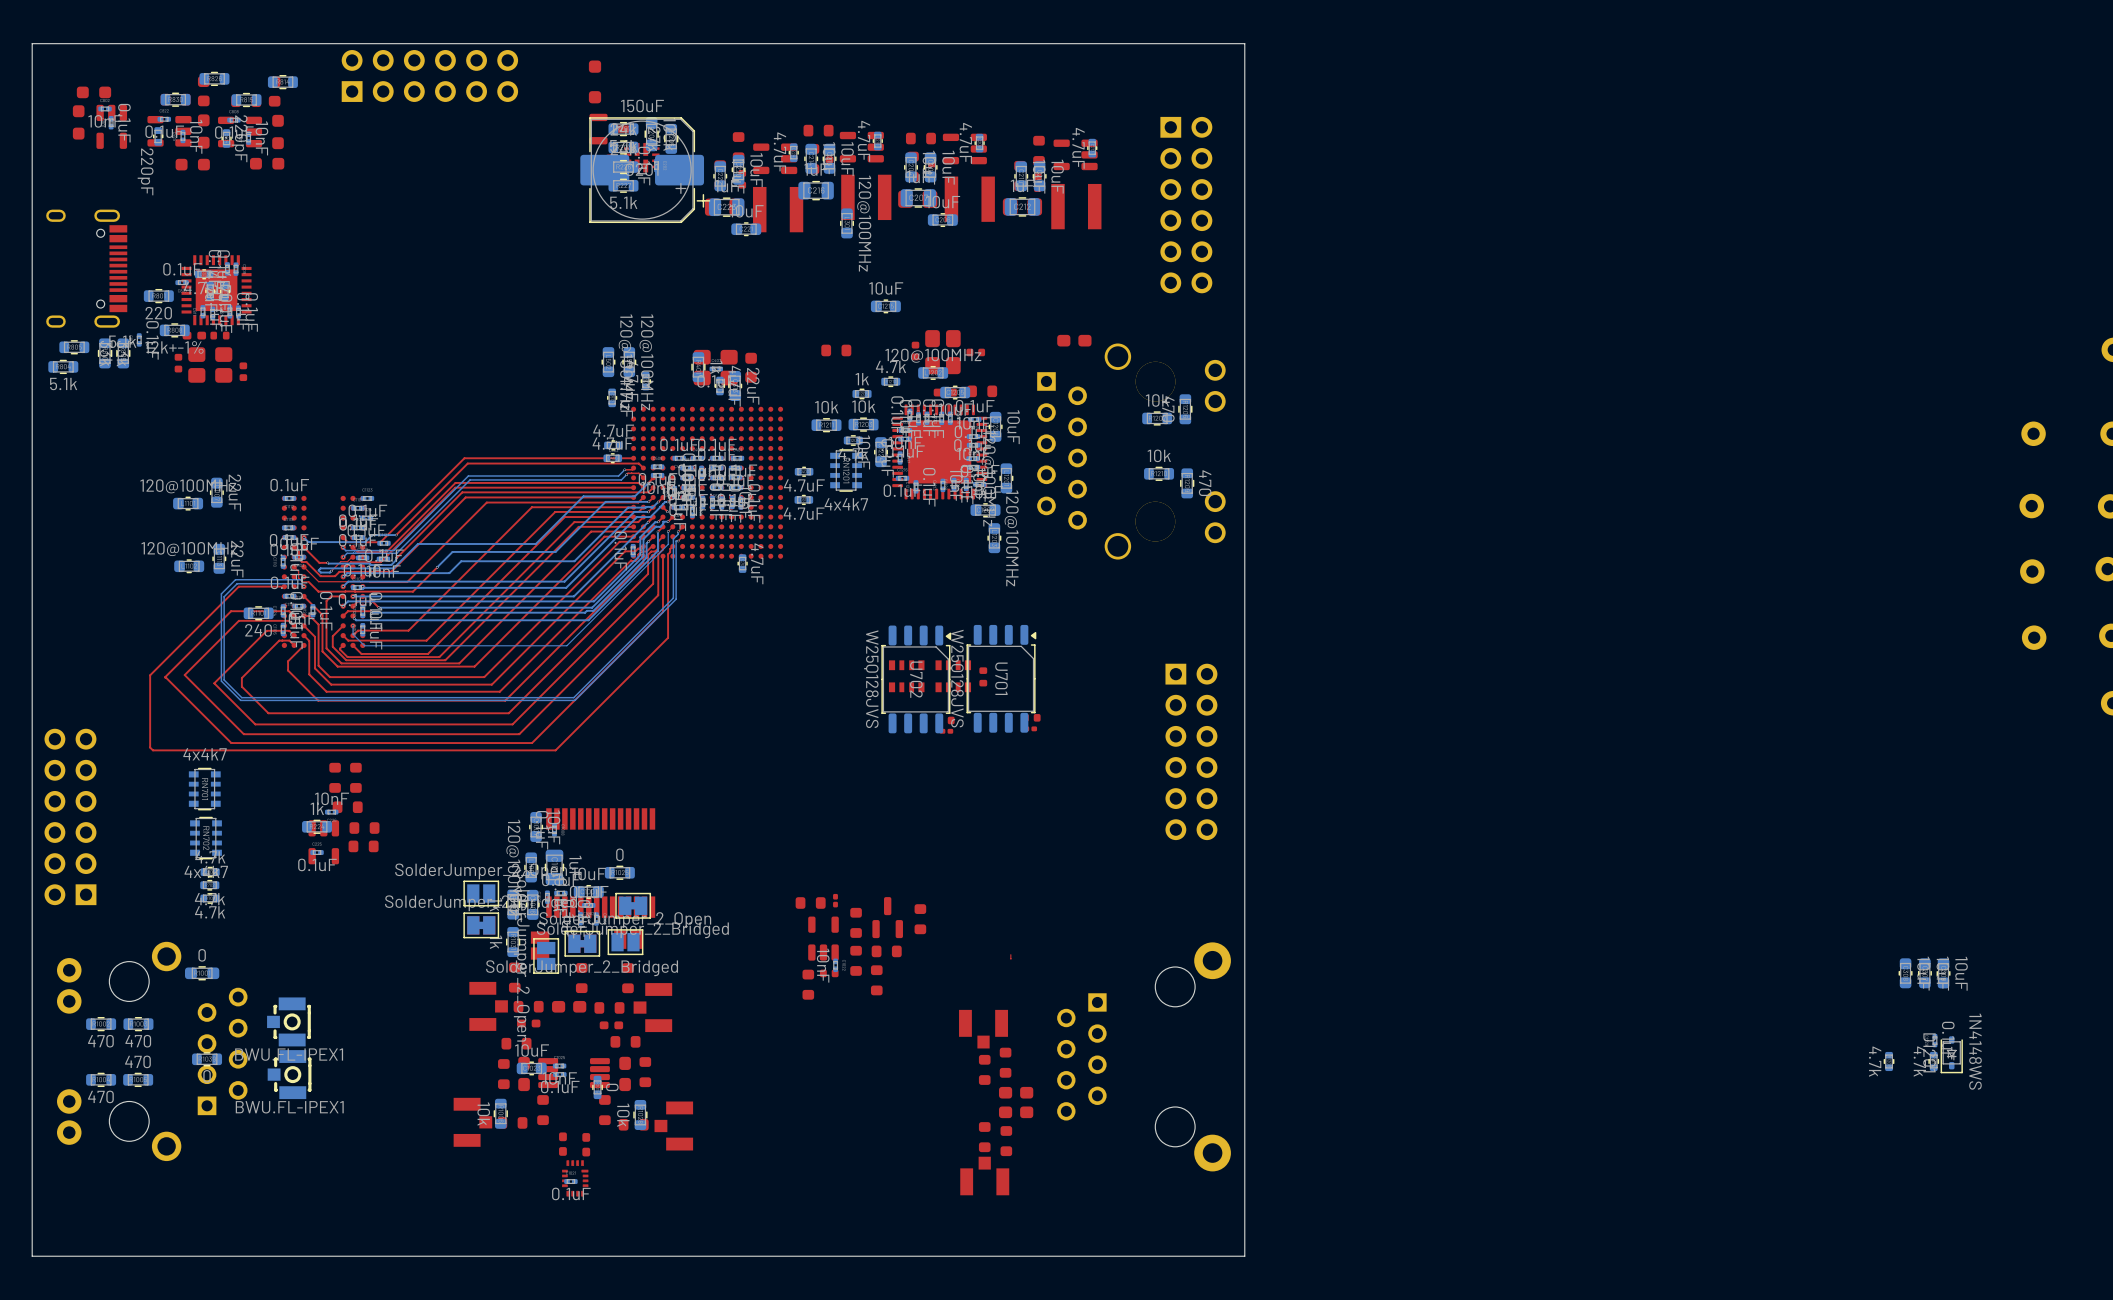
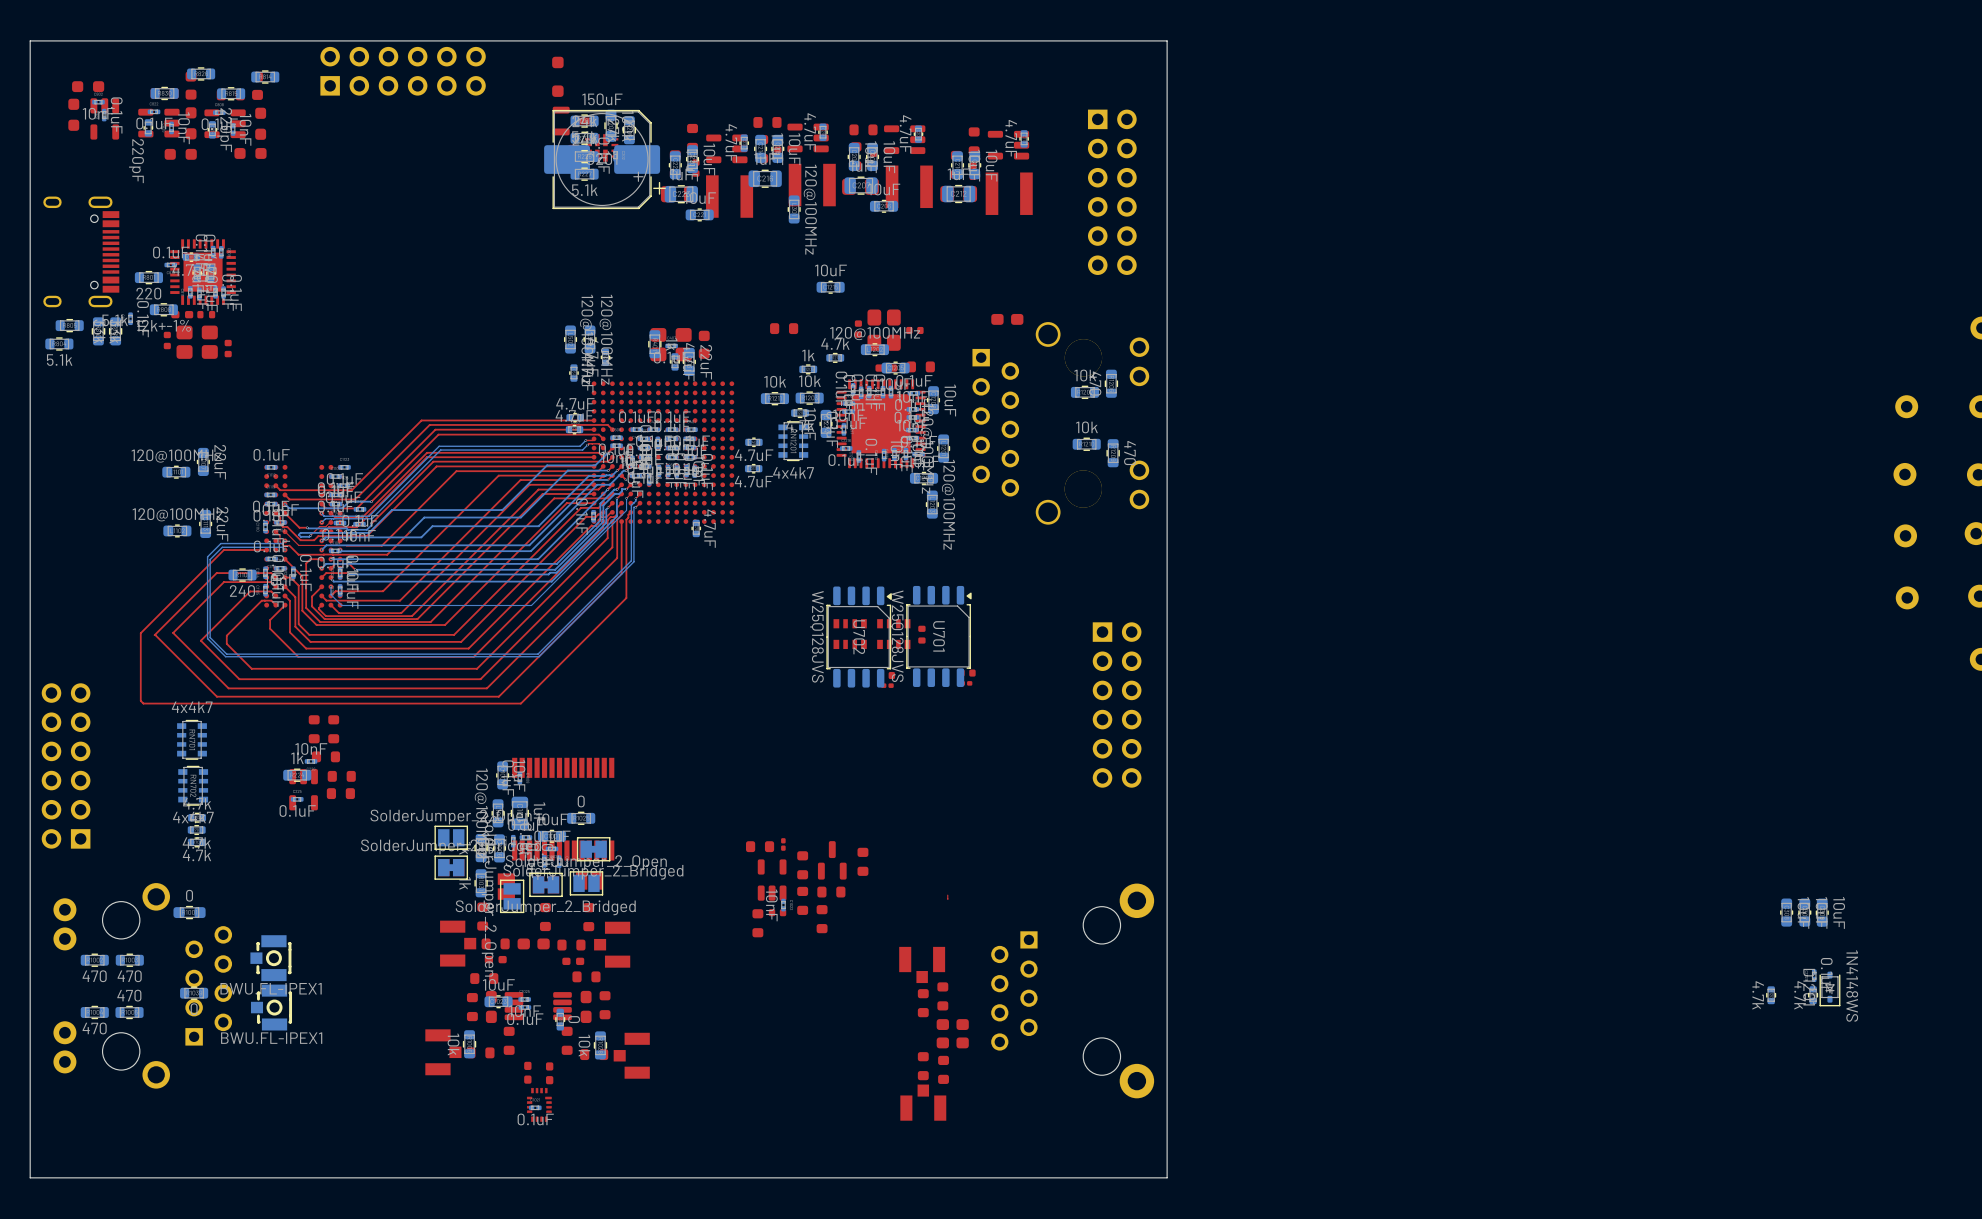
top track: none -> (594, 420) (421, 420) (351, 490) (280, 490) (275, 485)
top track: none -> (612, 429) (607, 424) (429, 424) (355, 499) (289, 499) (285, 494)

